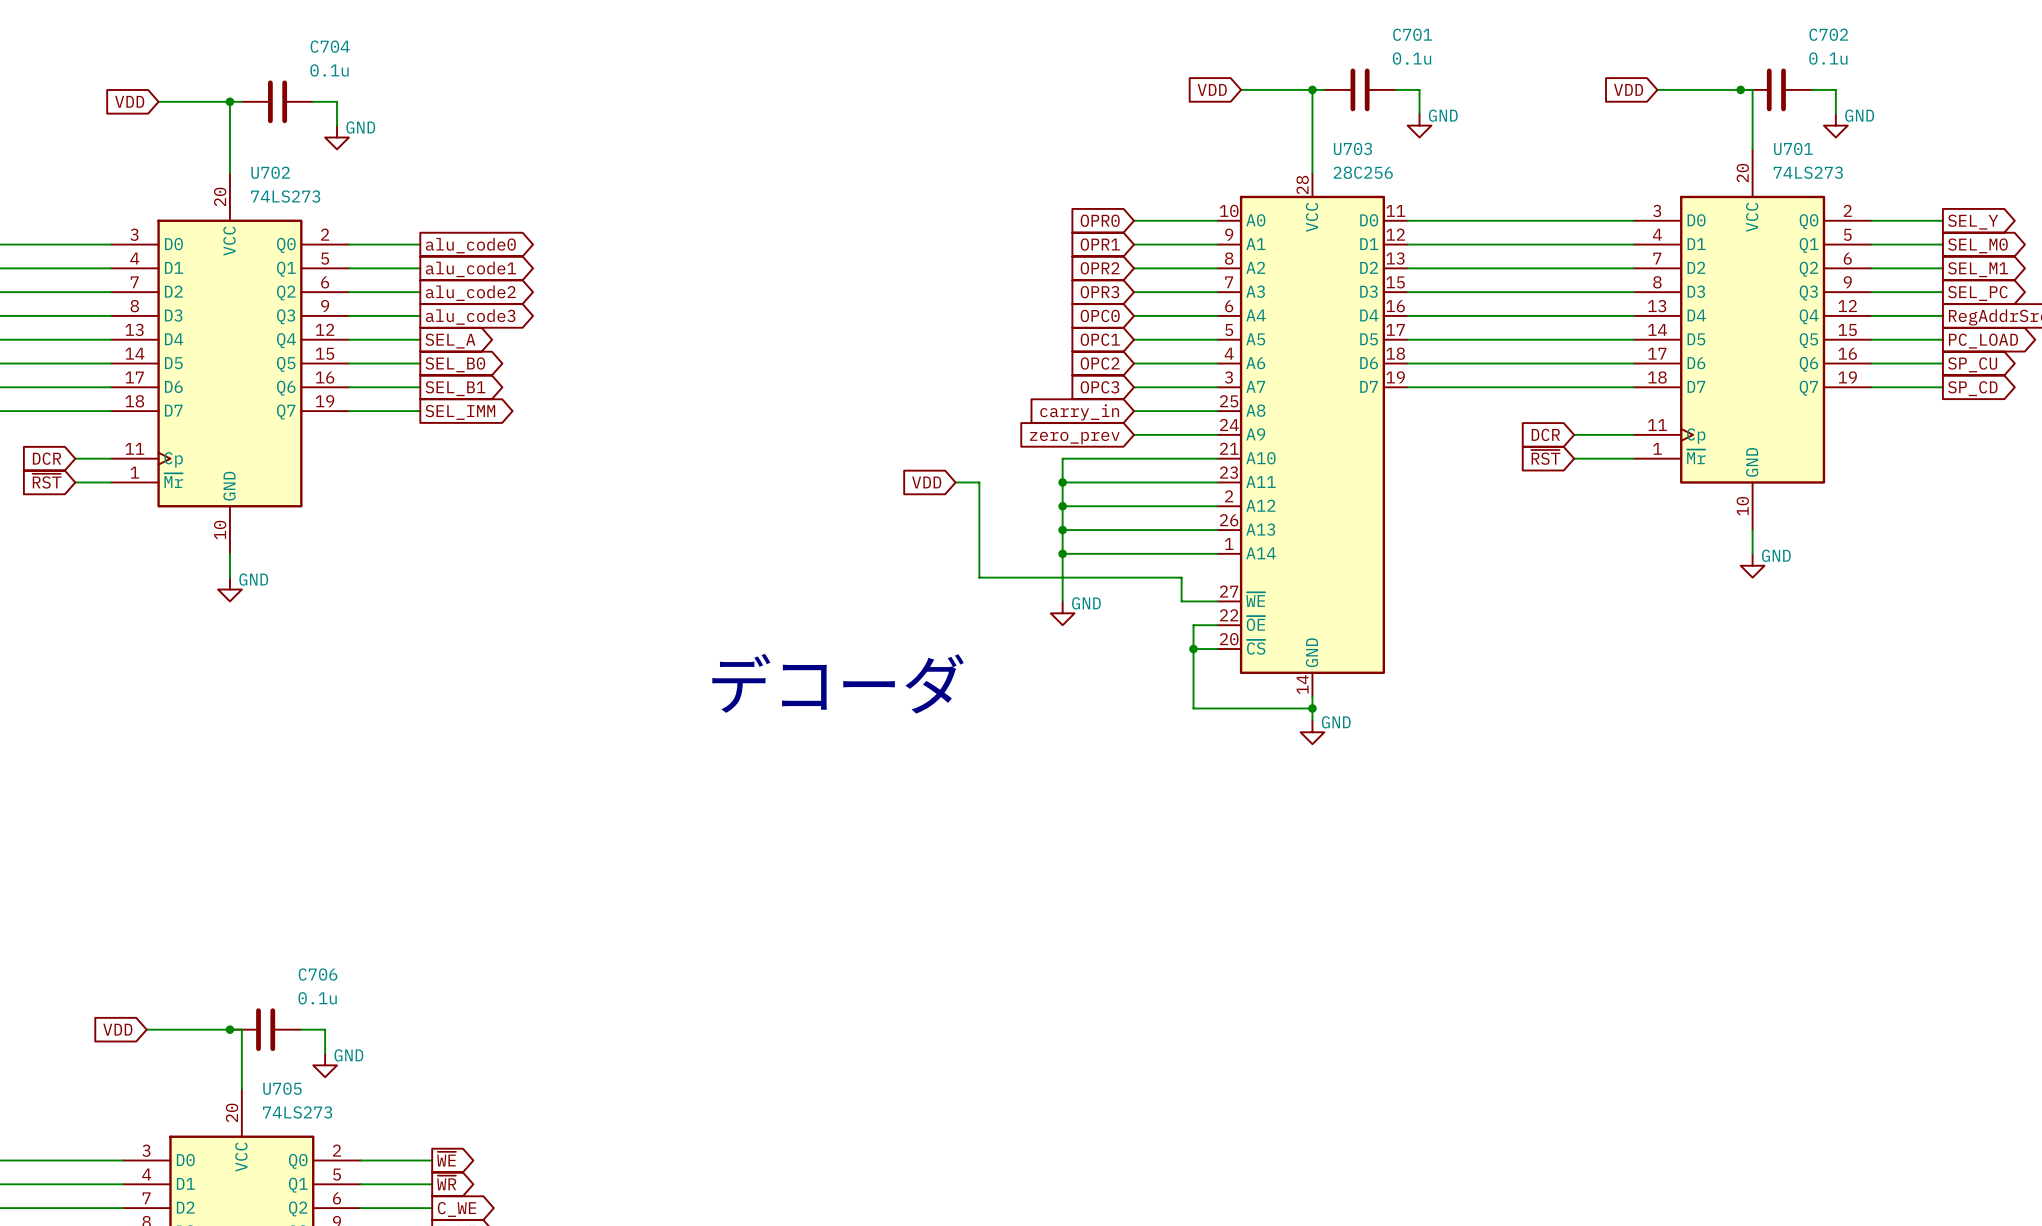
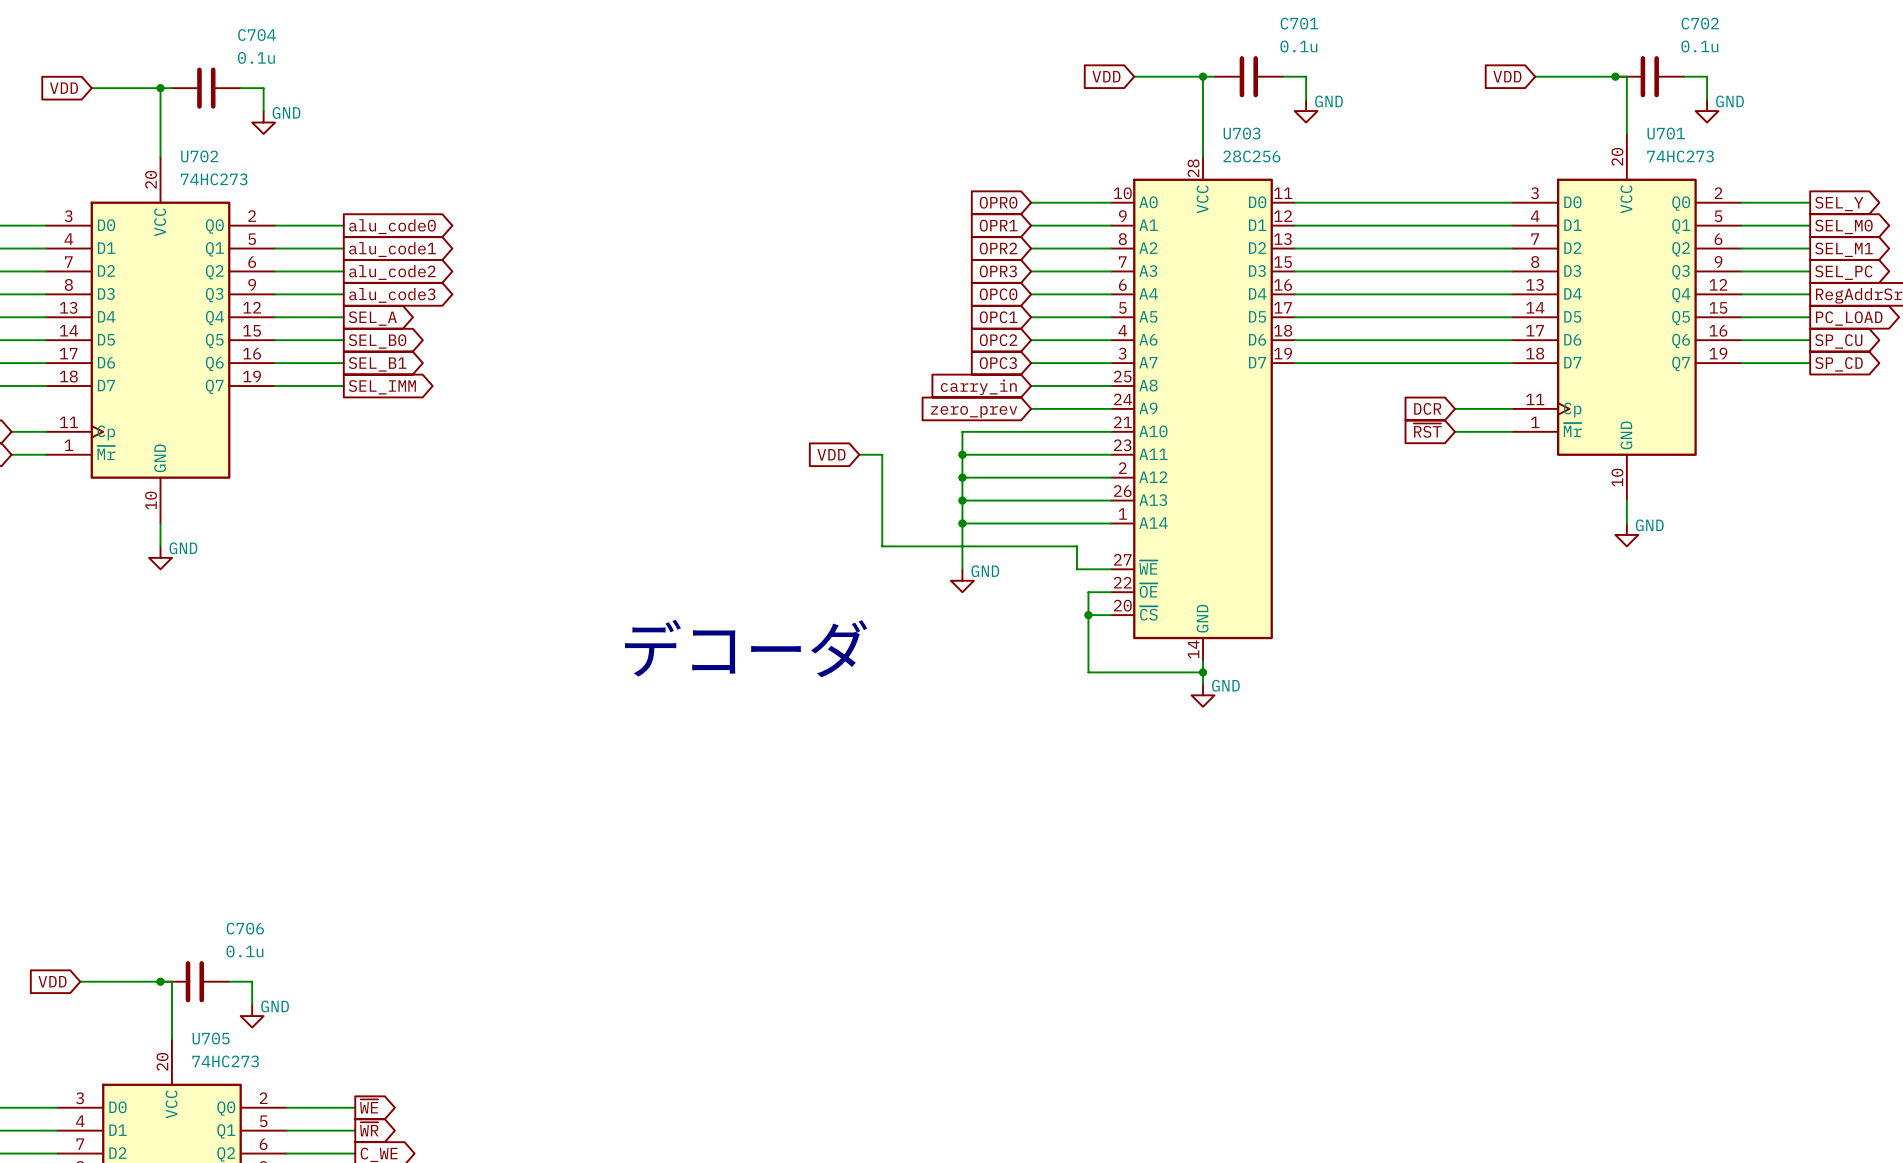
U701 value: 74LS273 (1808, 172) -> 74HC273 (1680, 156)
U702 value: 74LS273 (285, 196) -> 74HC273 (214, 179)
U705 value: 74LS273 (297, 1112) -> 74HC273 (225, 1061)

